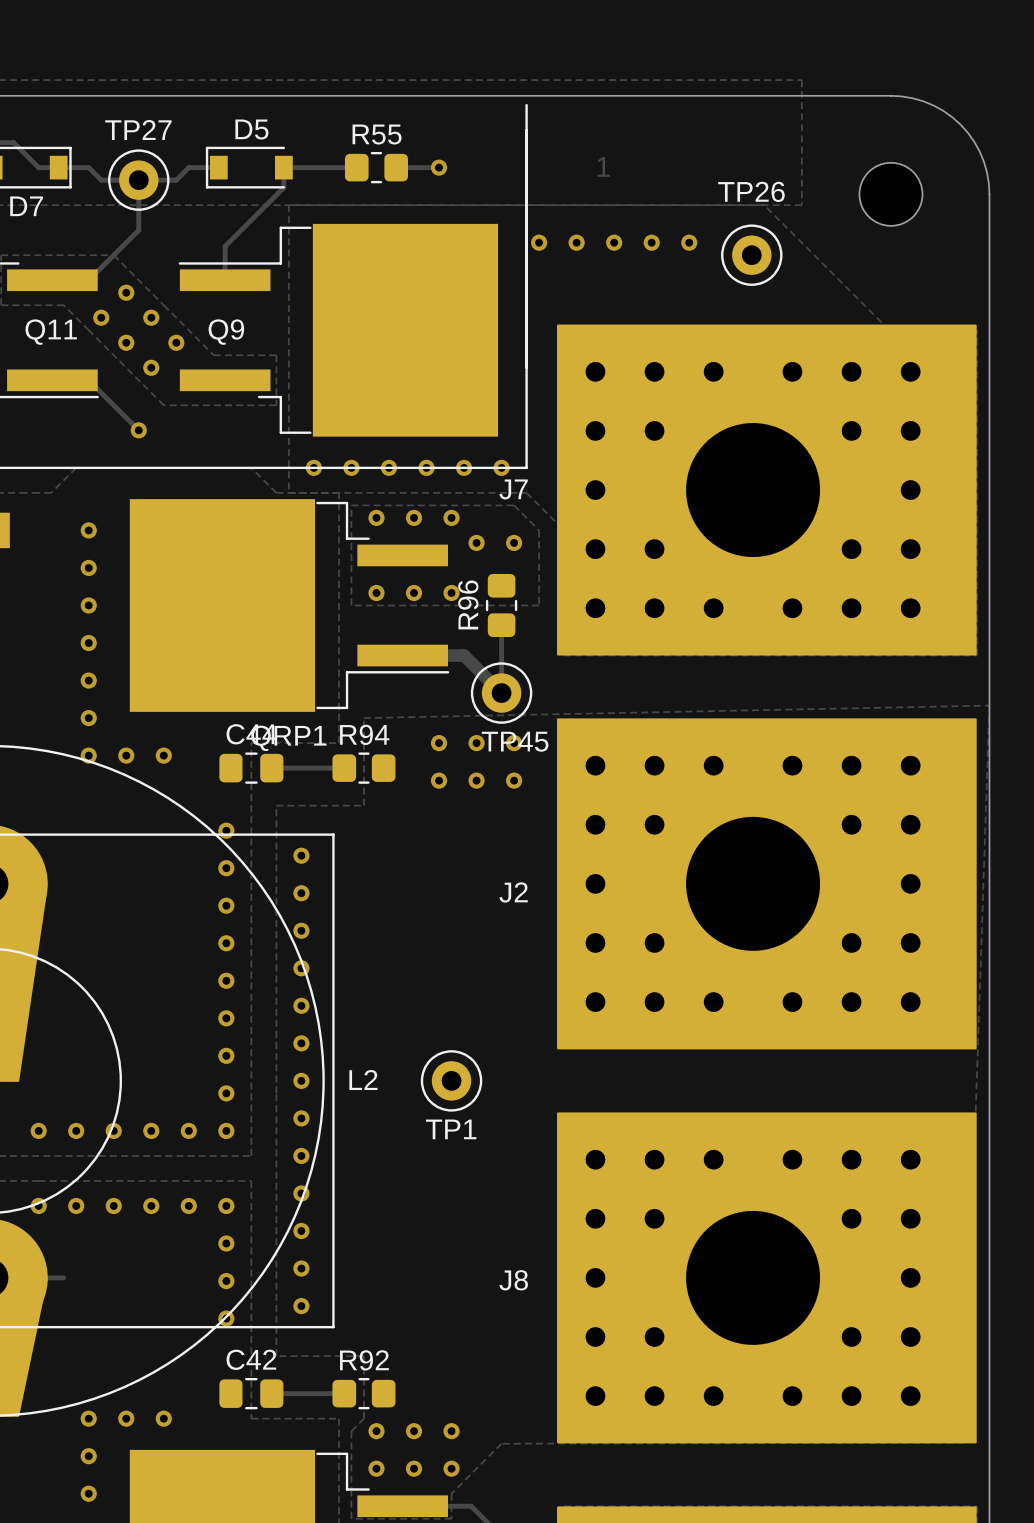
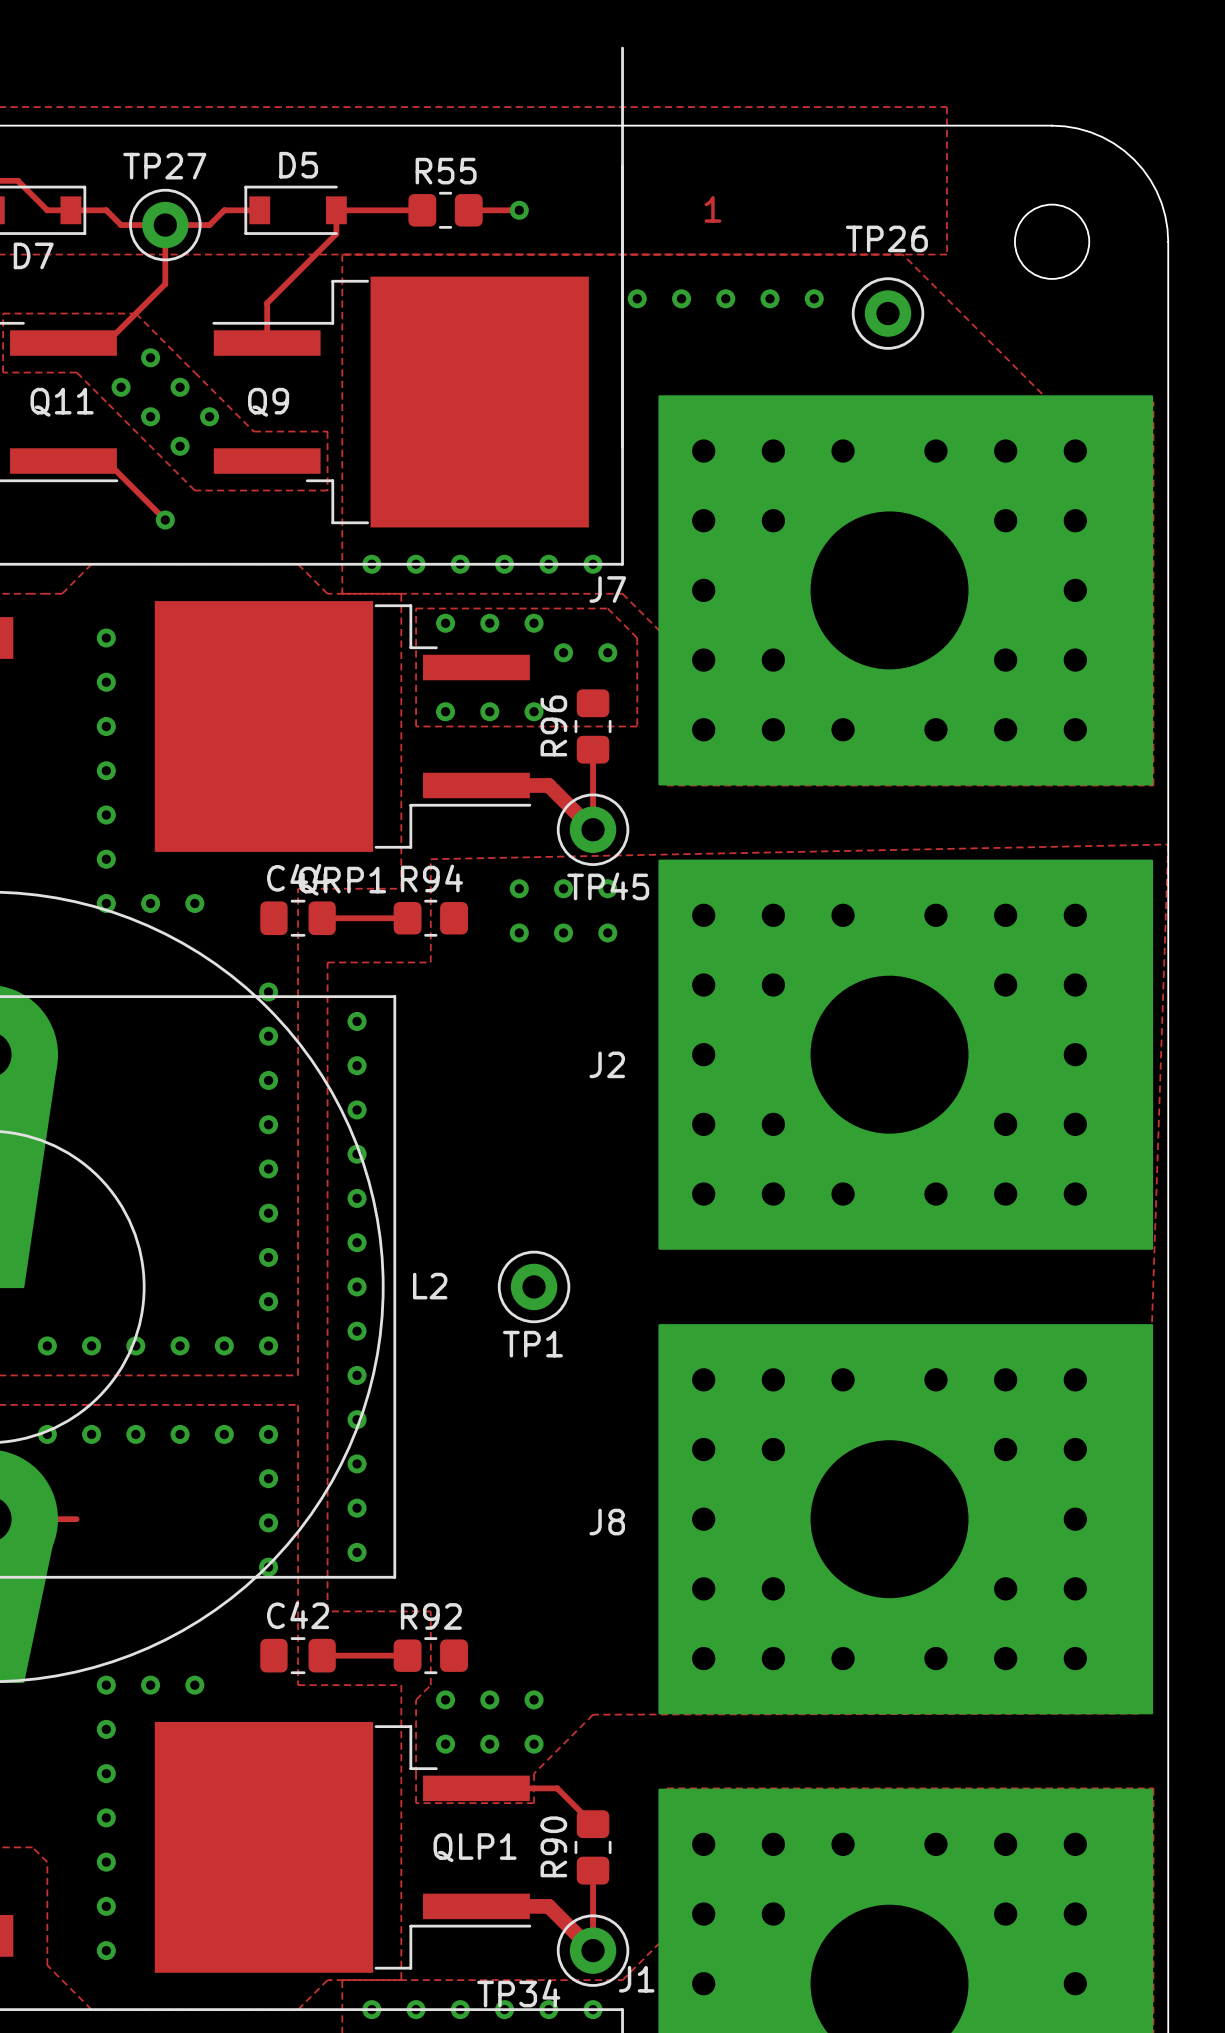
line: none -> (622, 48) (622, 136)

